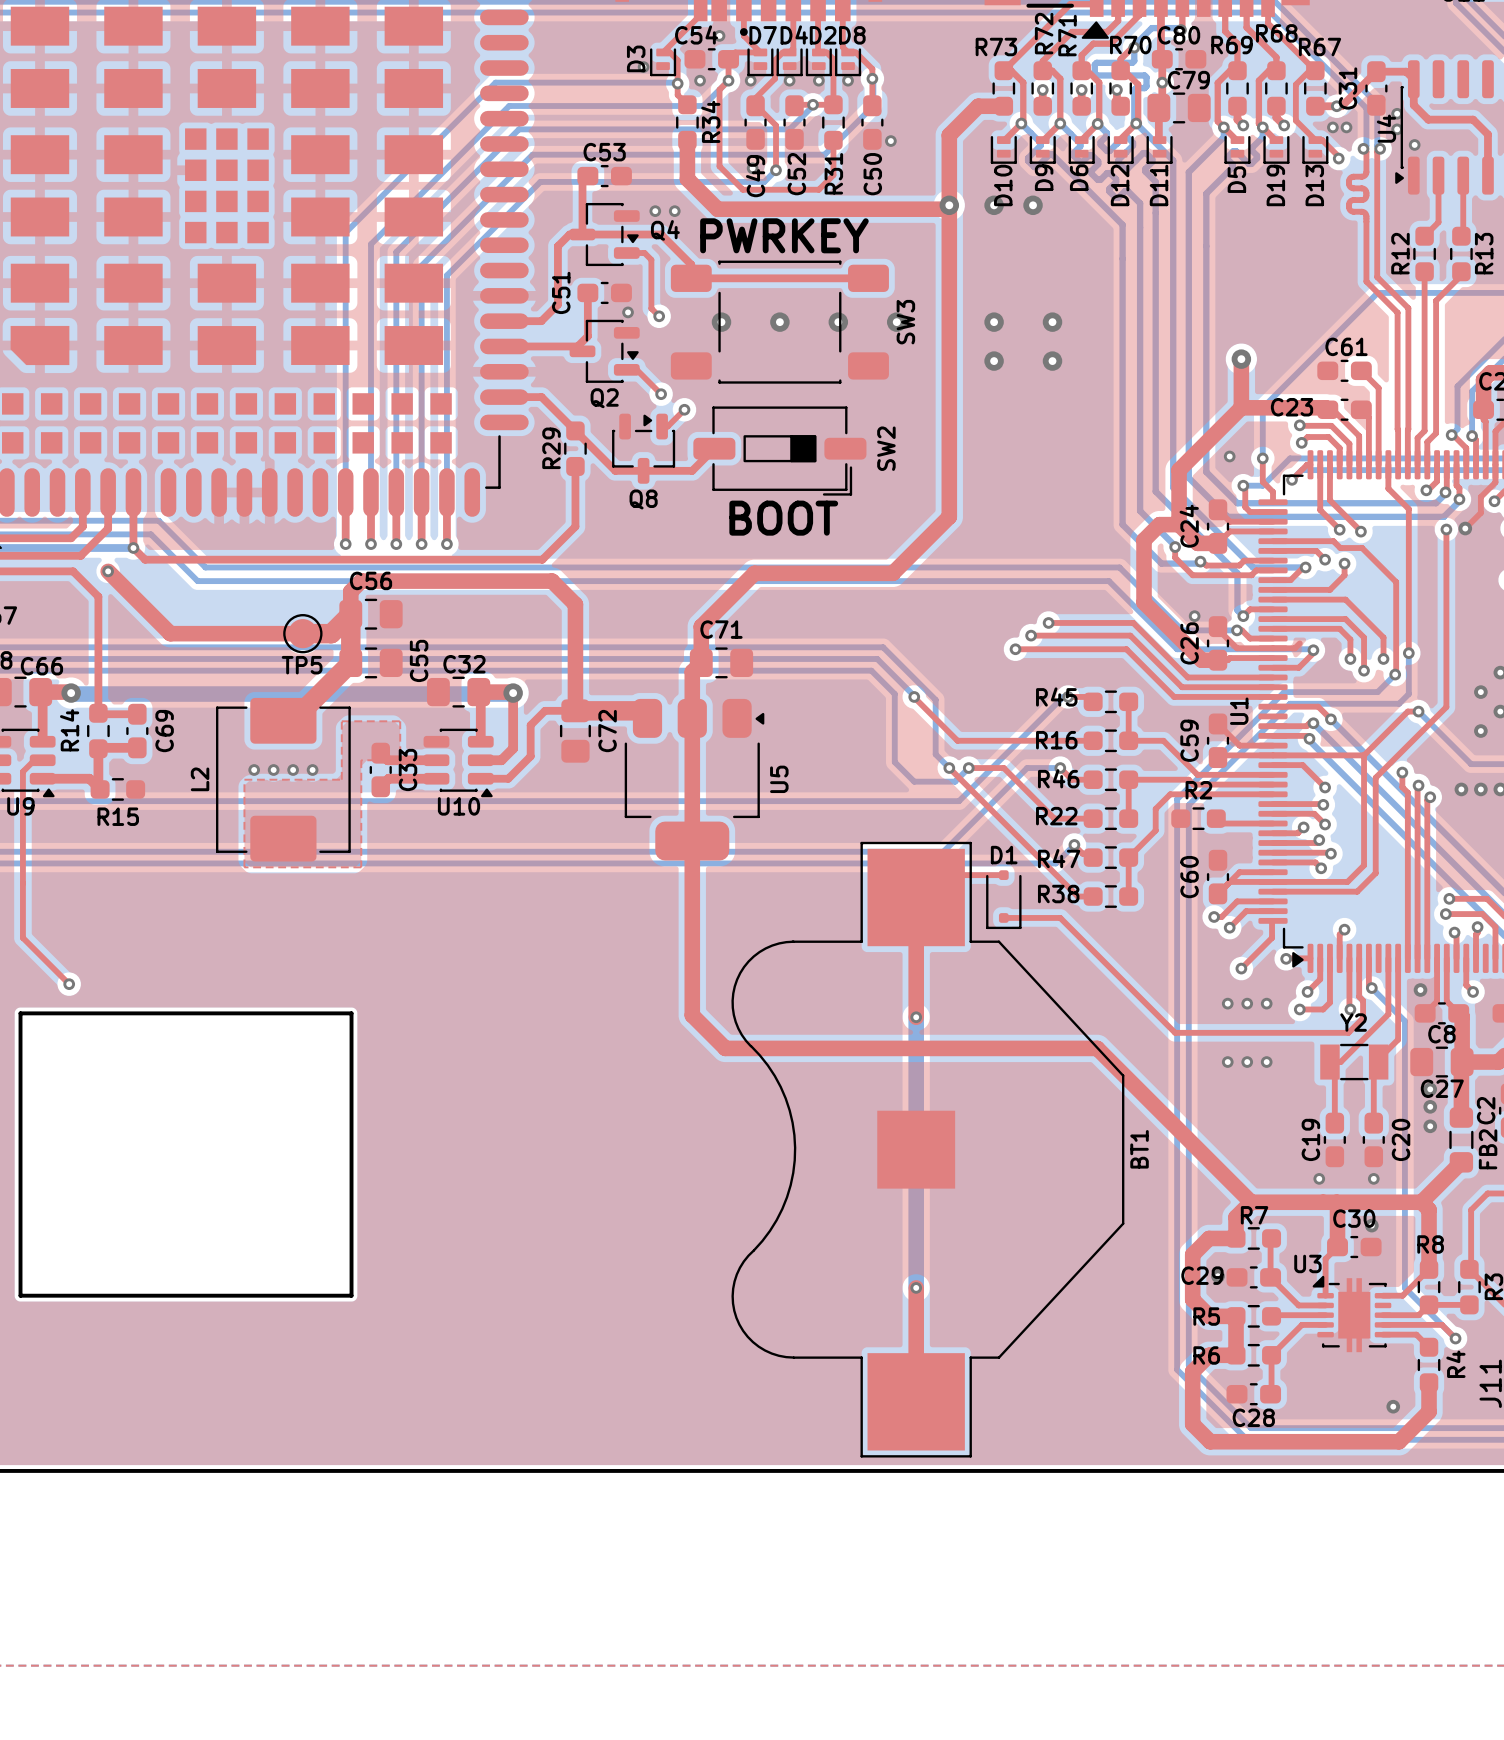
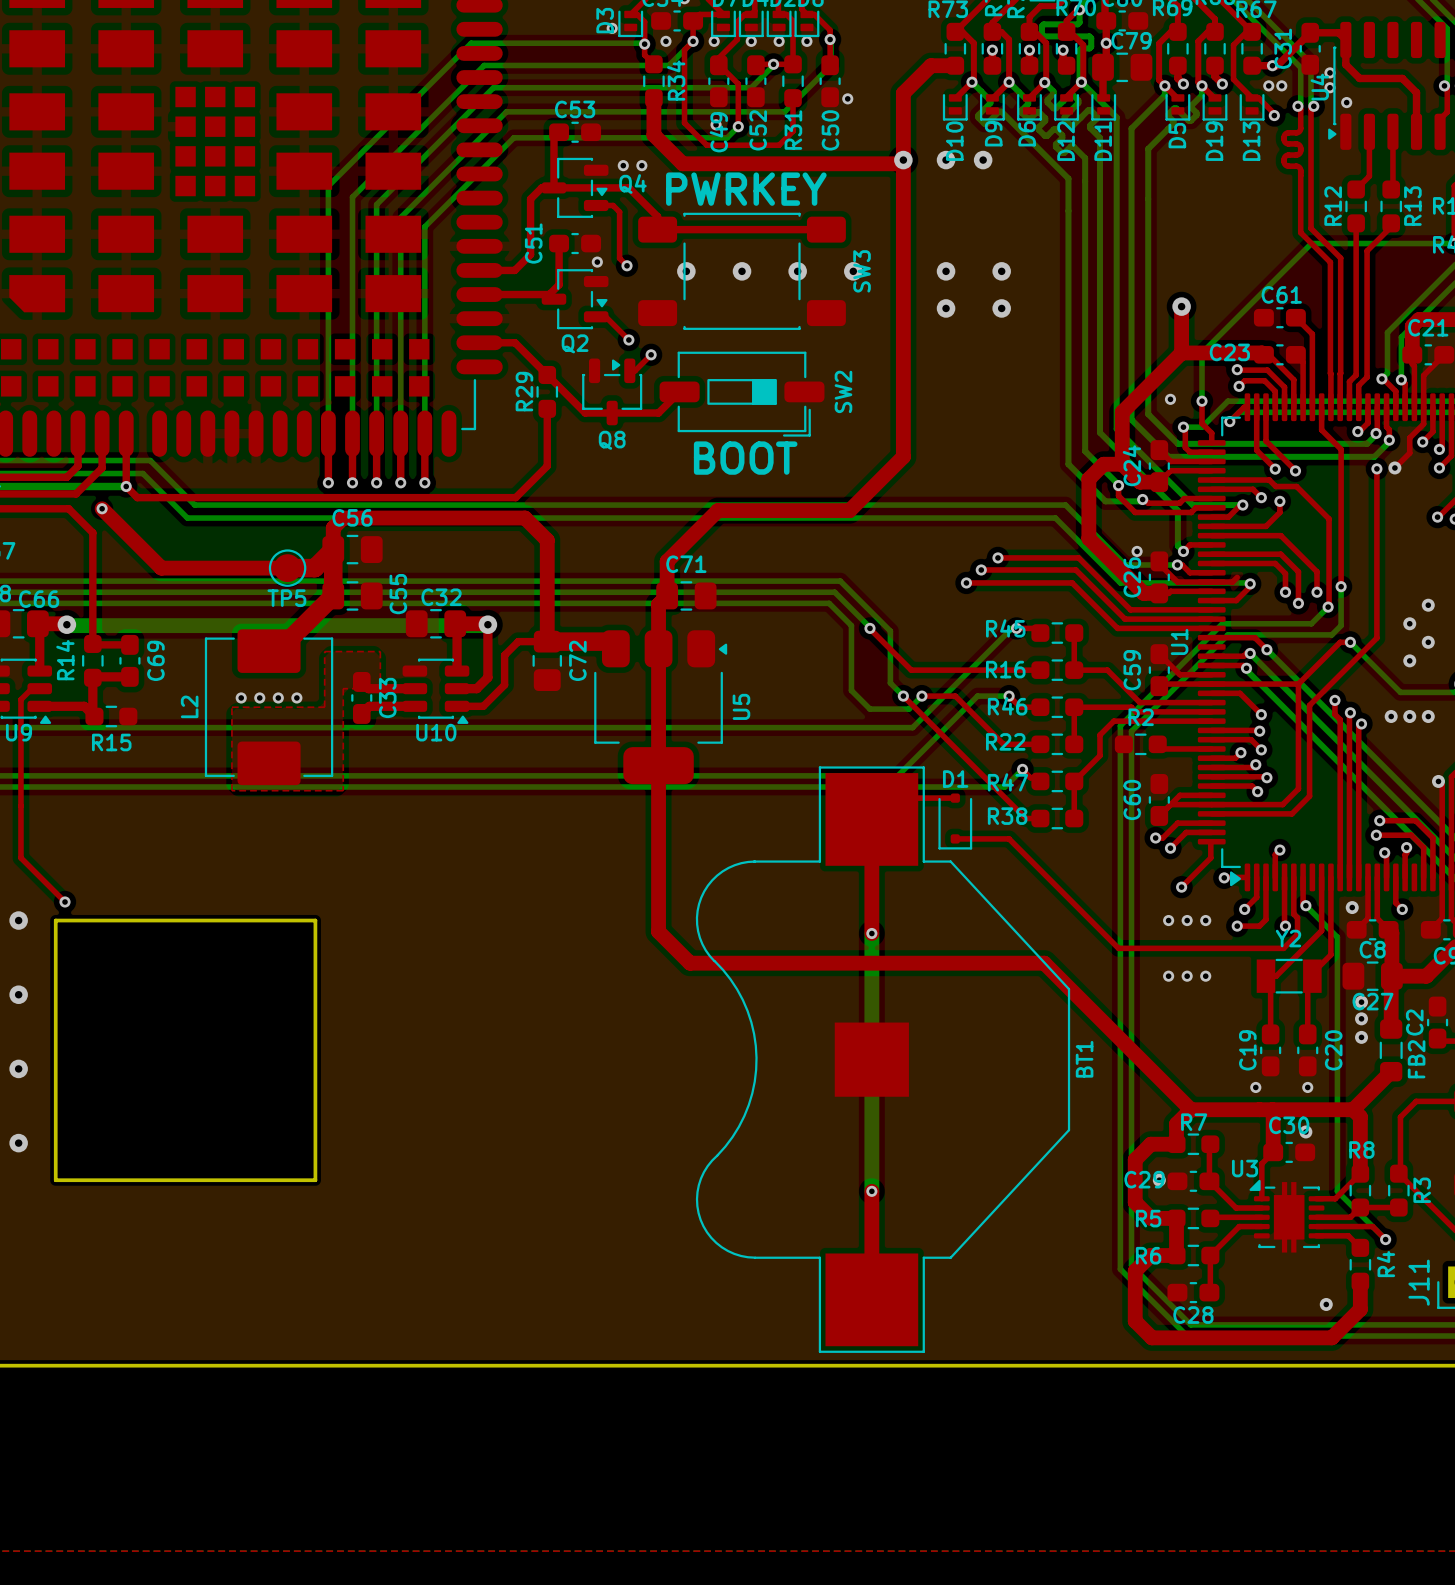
via: none -> (18, 920)
board edge: (20, 1013) (351, 1013) (351, 1295) (20, 1295) (20, 1013) -> (55, 920) (55, 1180) (315, 1180) (315, 920) (55, 920)
via: none -> (18, 994)
via: none -> (18, 1068)
via: none -> (18, 1143)

